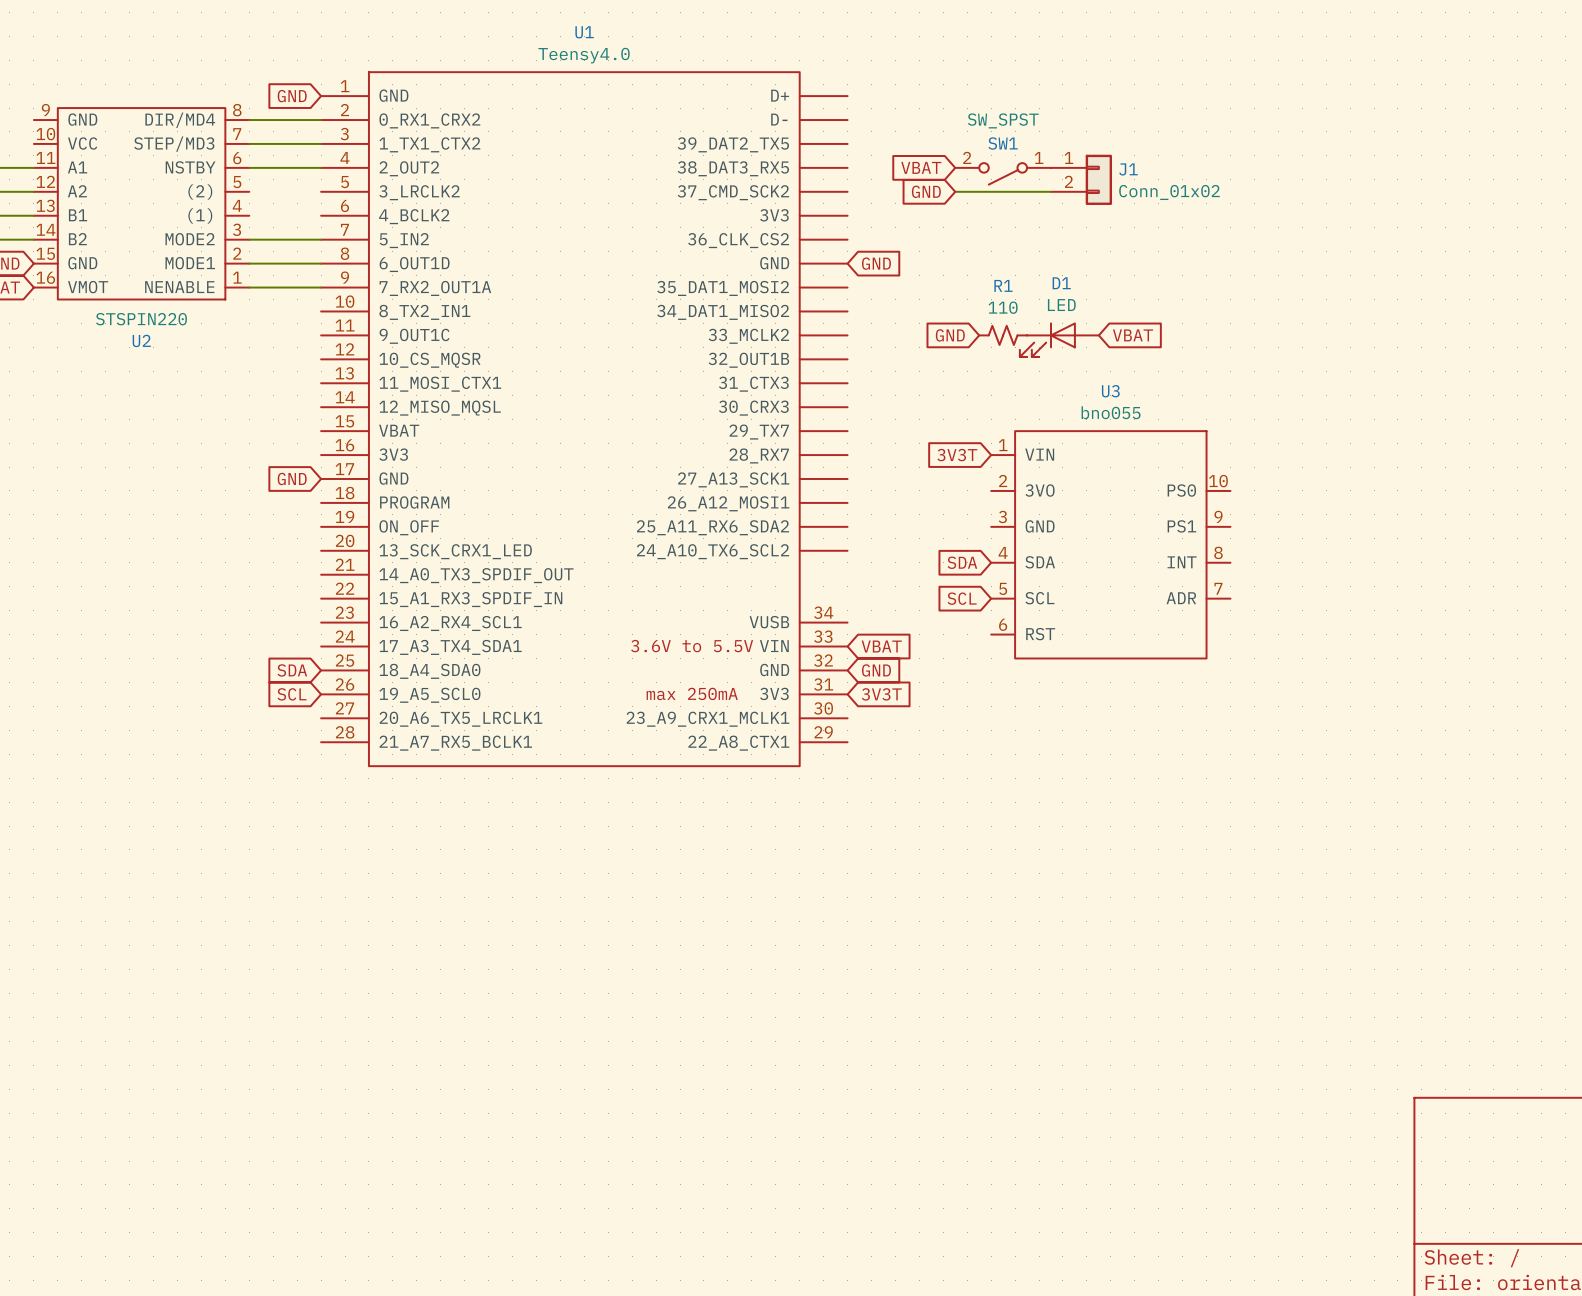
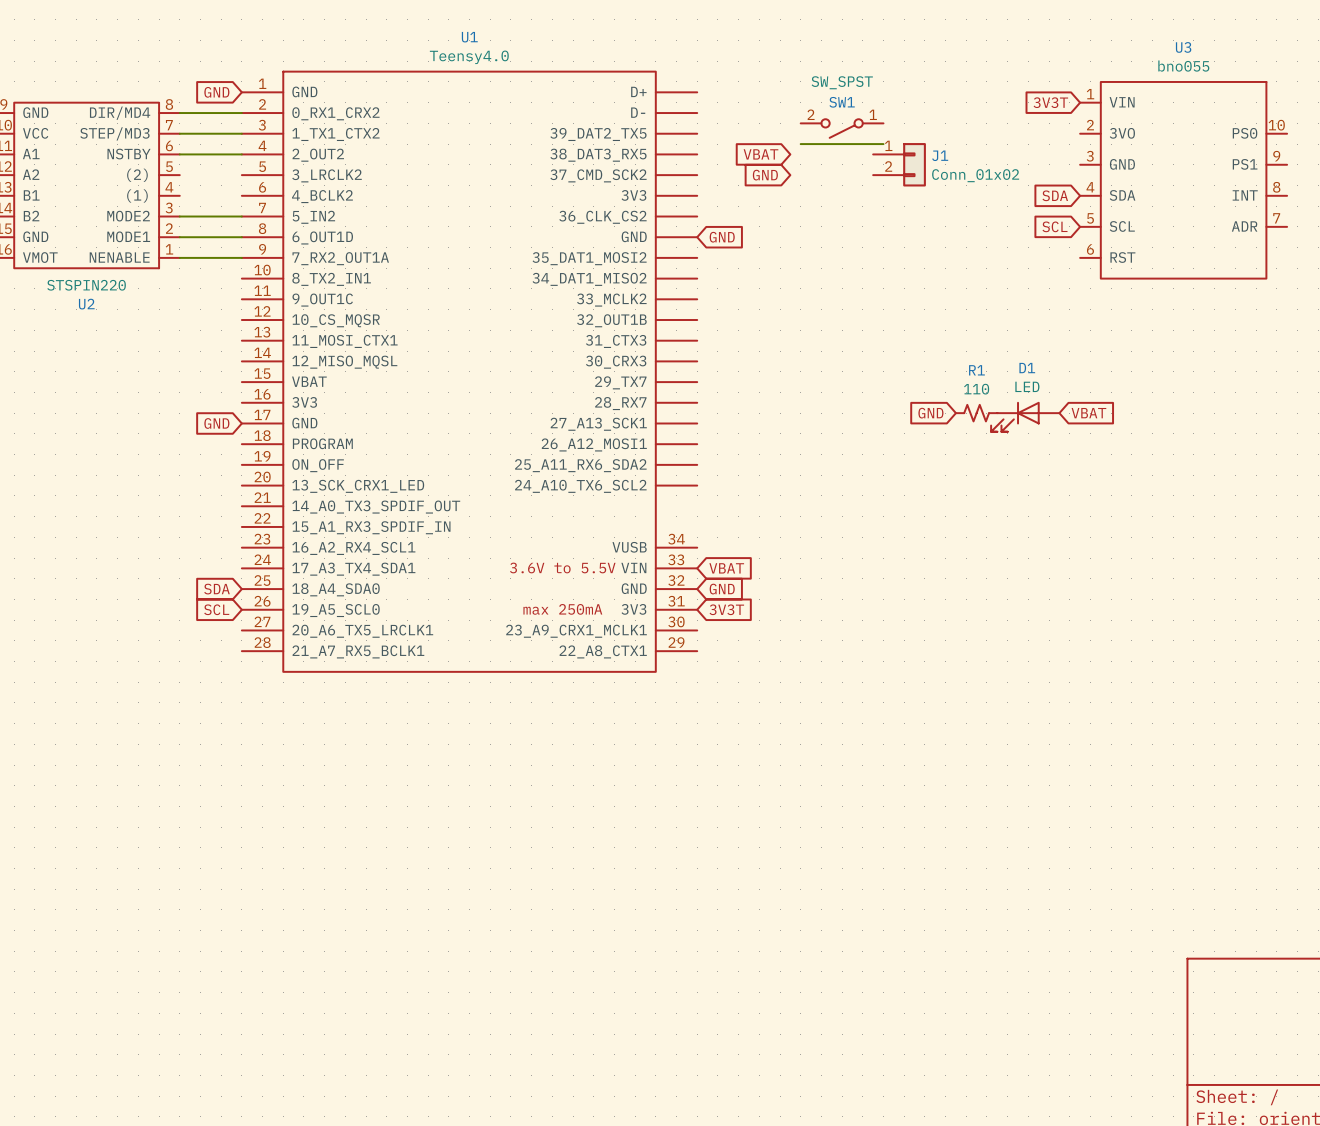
global label: none -> 3V3T (1050, 102)
SW1 position: (1003, 173) -> (842, 128)
wire: (955, 191) (1050, 191) -> (800, 144) (883, 144)
global label: none -> SDA (1055, 195)
global label: none -> SCL (1054, 226)
global label position: GND (950, 335) -> GND (930, 413)
R1 position: (1003, 335) -> (976, 413)
global label position: VBAT (1132, 335) -> VBAT (1088, 413)
D1 position: (1059, 339) -> (1025, 416)
global label: 3V3T (957, 455) -> none
U3 position: (1110, 544) -> (1183, 180)
global label: SDA (962, 562) -> none
global label: SCL (962, 598) -> none

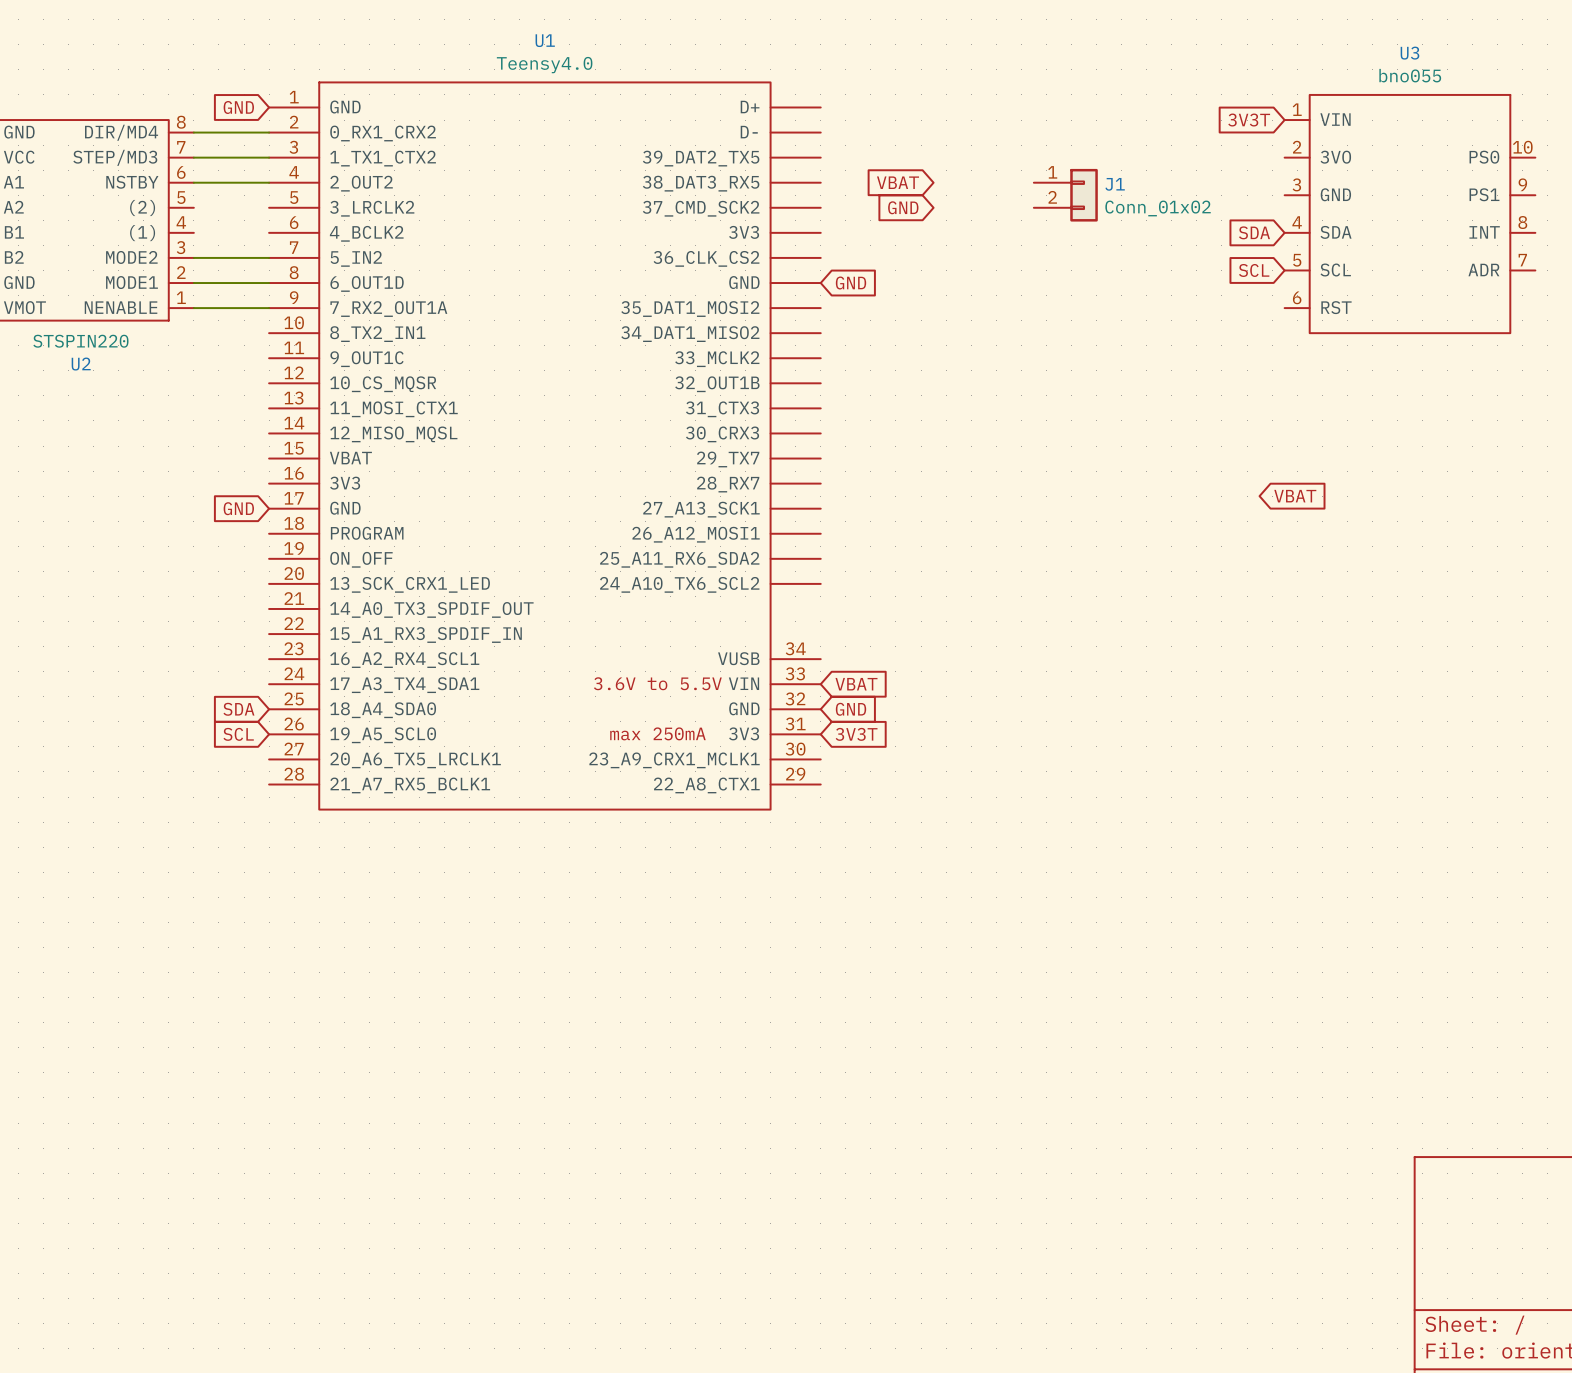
SW1: SW_SPST (842, 128) -> none
wire: (800, 144) (883, 144) -> none
global label: GND (930, 413) -> none
R1: 110 (976, 413) -> none
D1: LED (1025, 416) -> none

